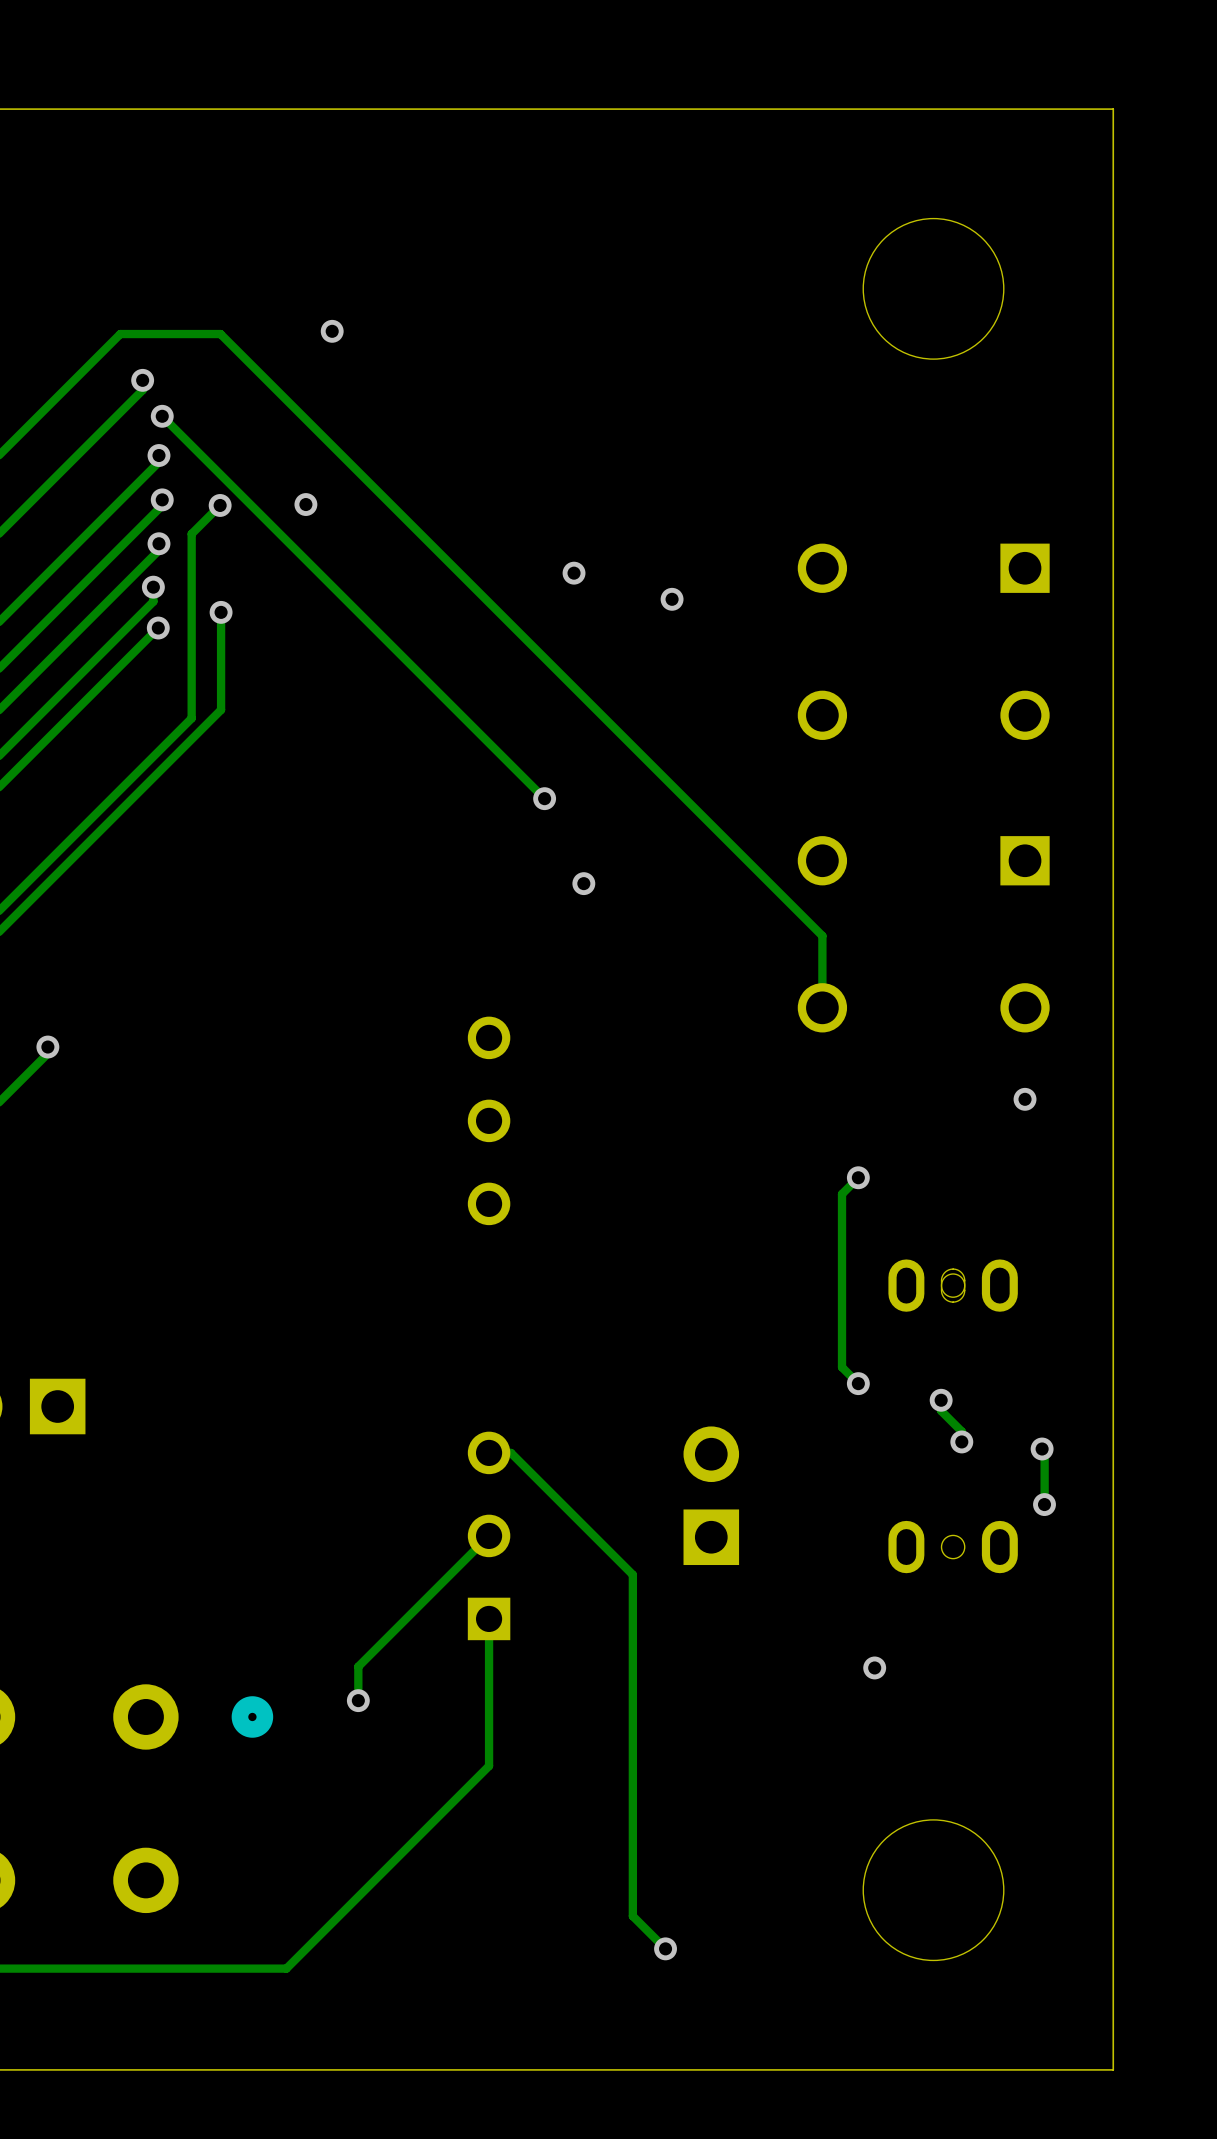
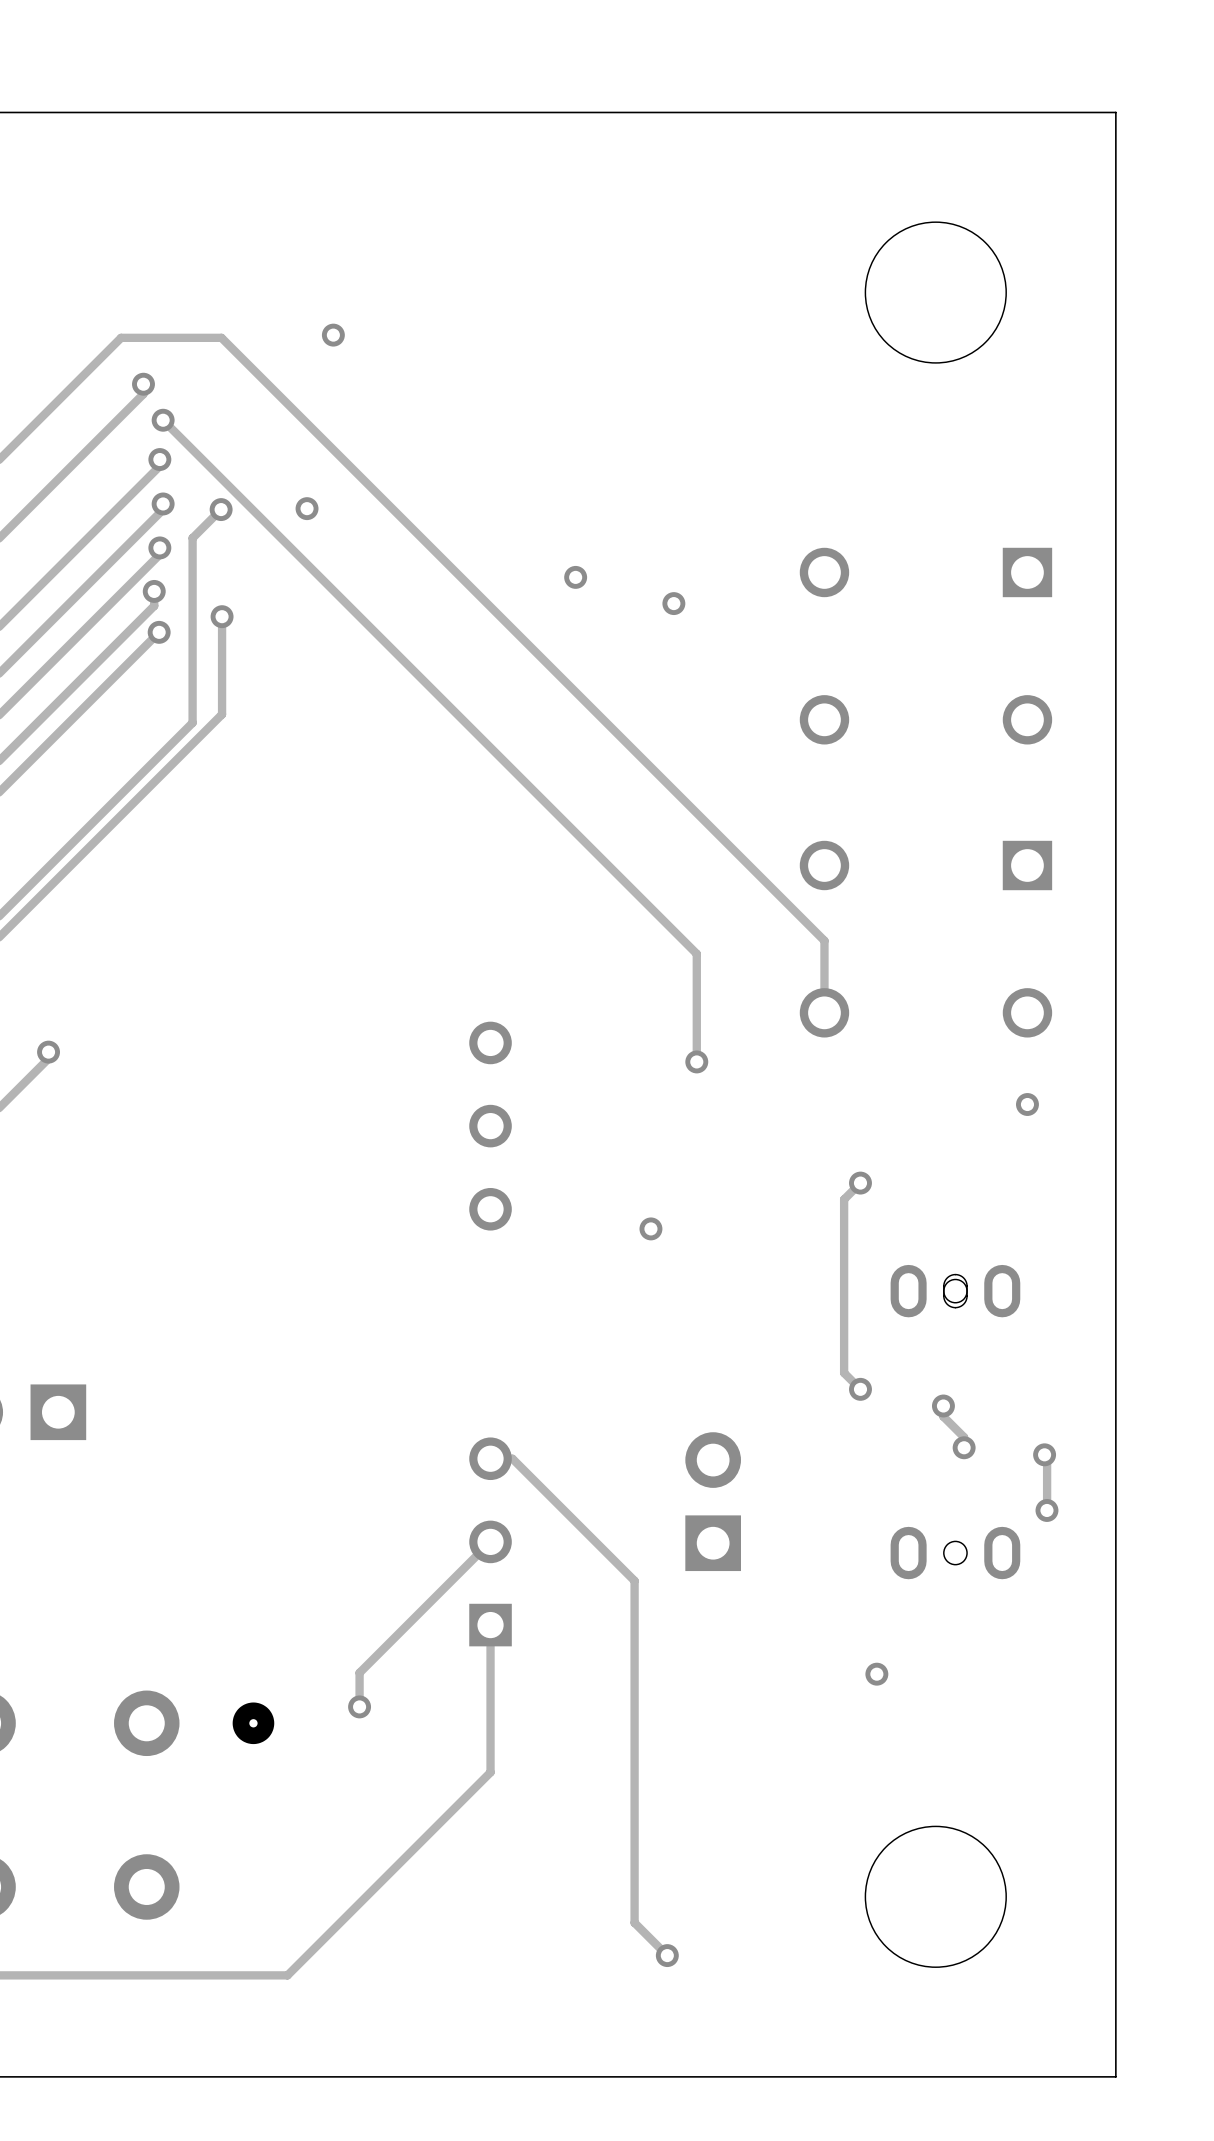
track: none -> (546, 803) (696, 953) (696, 1061)
via: (544, 798) -> none
via: (583, 883) -> none
via: none -> (696, 1061)
via: none -> (650, 1228)

